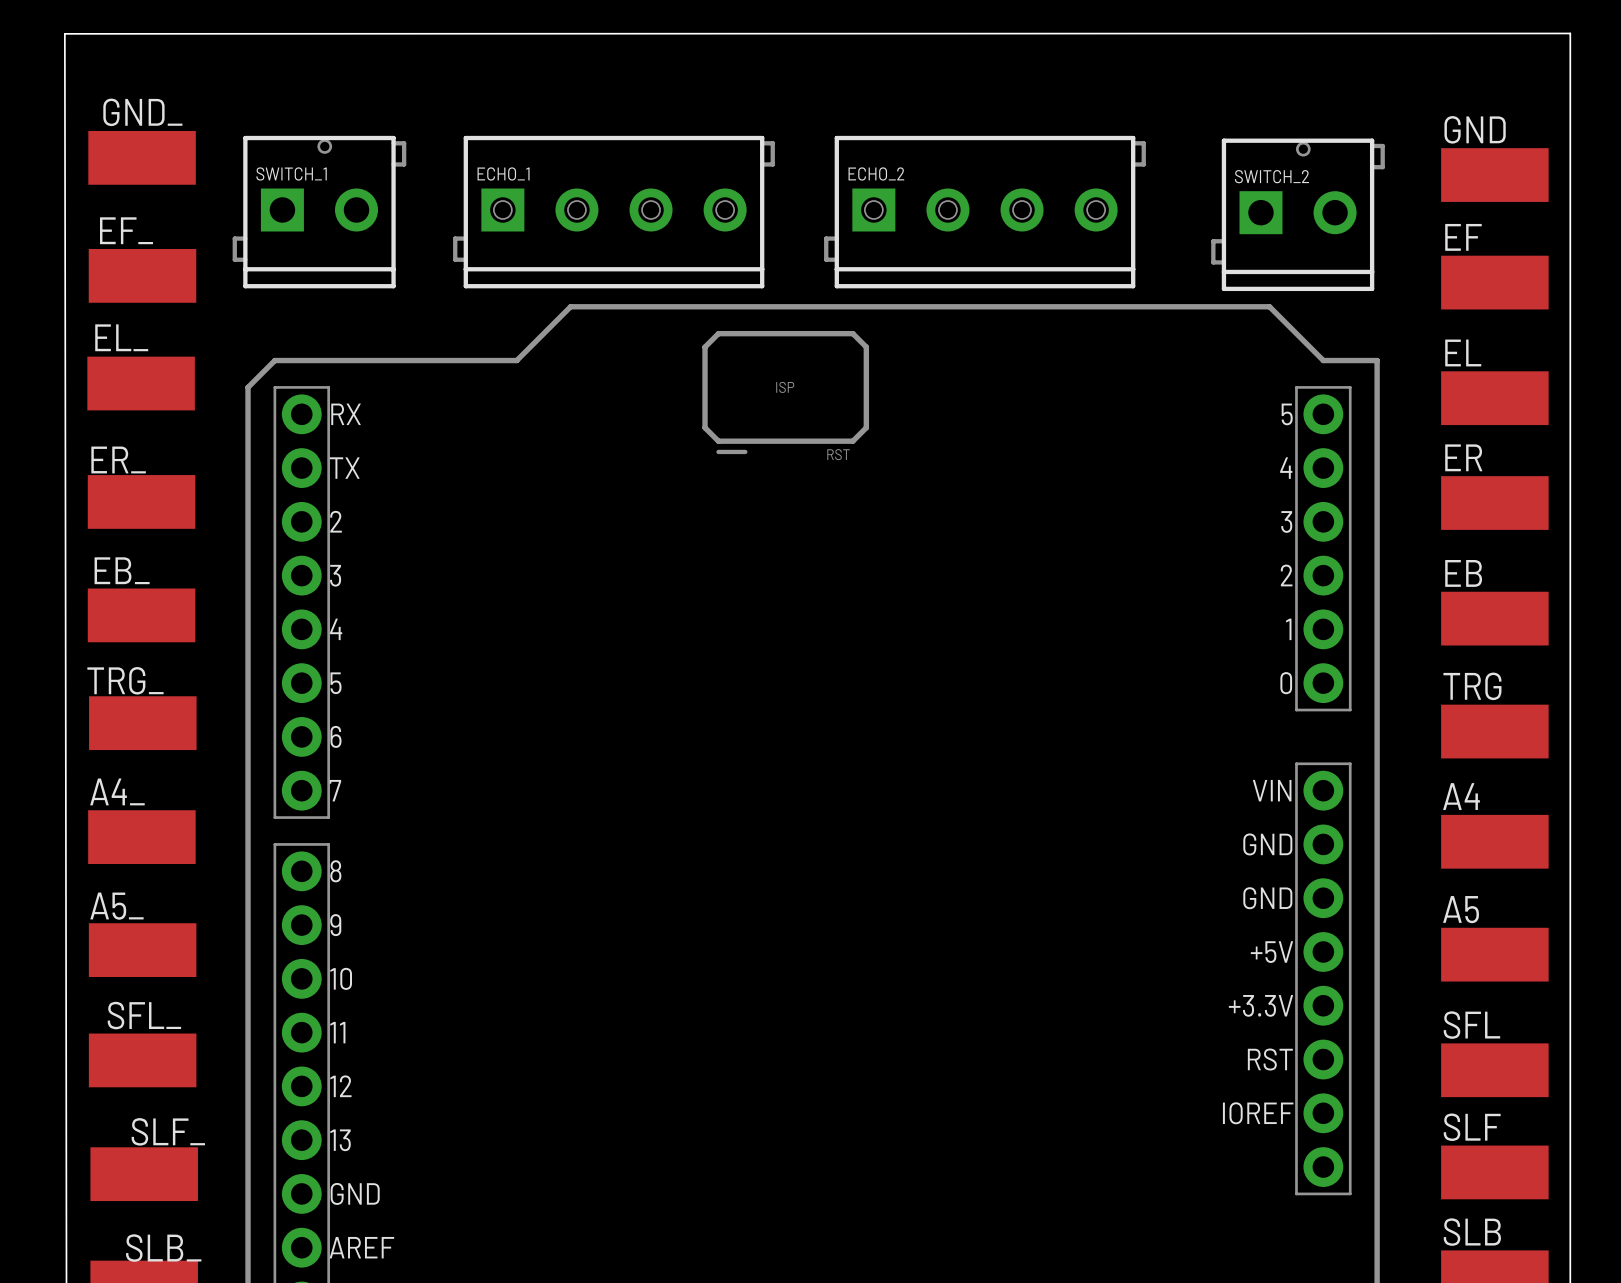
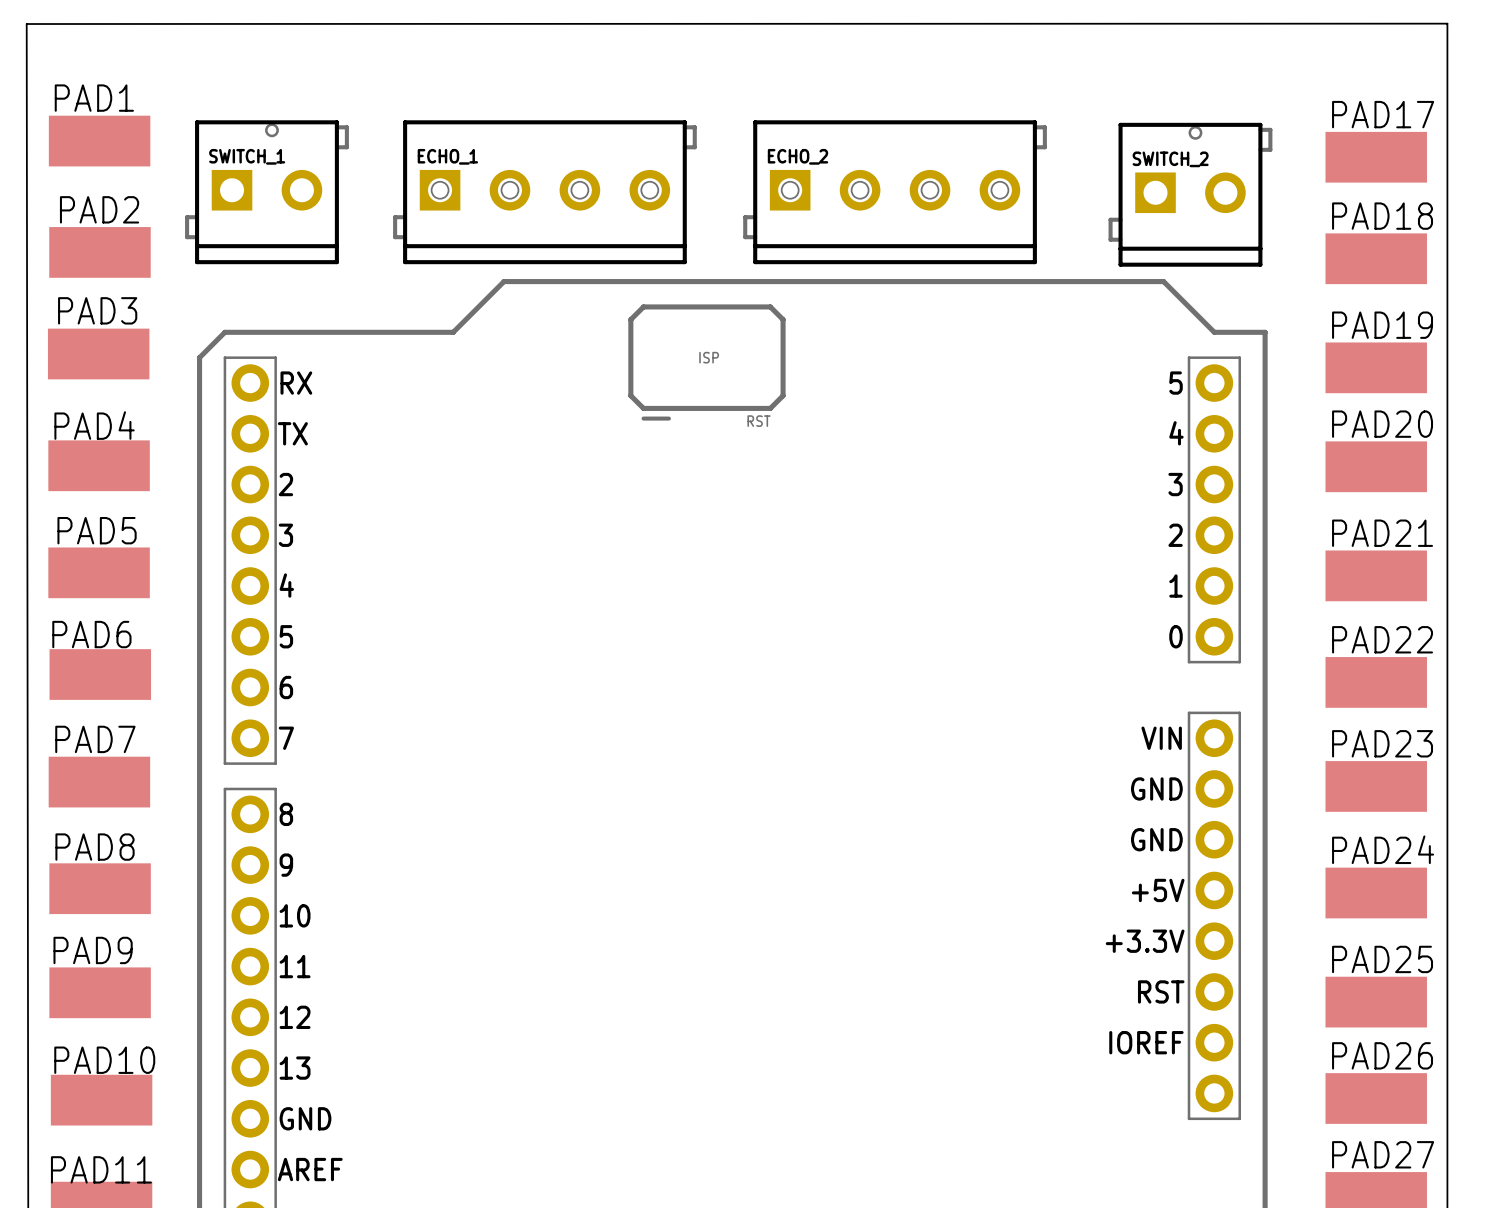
GND_ name: GND_ (142, 112) -> PAD1 (94, 98)
GND name: GND (1475, 129) -> PAD17 (1383, 114)
EF_ name: EF_ (126, 230) -> PAD2 (99, 209)
EF name: EF (1463, 237) -> PAD18 (1382, 216)
EL_ name: EL_ (121, 337) -> PAD3 (97, 310)
EL name: EL (1463, 352) -> PAD19 (1382, 325)
ER name: ER (1463, 457) -> PAD20 (1382, 424)
ER_ name: ER_ (118, 459) -> PAD4 (94, 425)
EB_ name: EB_ (122, 570) -> PAD5 (97, 530)
EB name: EB (1463, 573) -> PAD21 (1382, 533)
TRG_ name: TRG_ (125, 680) -> PAD6 (91, 634)
TRG name: TRG (1472, 686) -> PAD22 (1382, 639)
A4_ name: A4_ (117, 791) -> PAD7 (95, 739)
A4 name: A4 (1461, 796) -> PAD23 (1382, 743)
A5_ name: A5_ (116, 906) -> PAD8 (95, 847)
A5 name: A5 (1461, 909) -> PAD24 (1383, 849)
SFL_ name: SFL_ (144, 1015) -> PAD9 (93, 950)
SFL name: SFL (1471, 1025) -> PAD25 (1382, 959)
SLF name: SLF (1472, 1127) -> PAD26 (1382, 1055)
SLF_ name: SLF_ (168, 1131) -> PAD10 (104, 1060)
SLB name: SLB (1472, 1232) -> PAD27 (1383, 1154)
SLB_ name: SLB_ (163, 1248) -> PAD11 (101, 1169)

